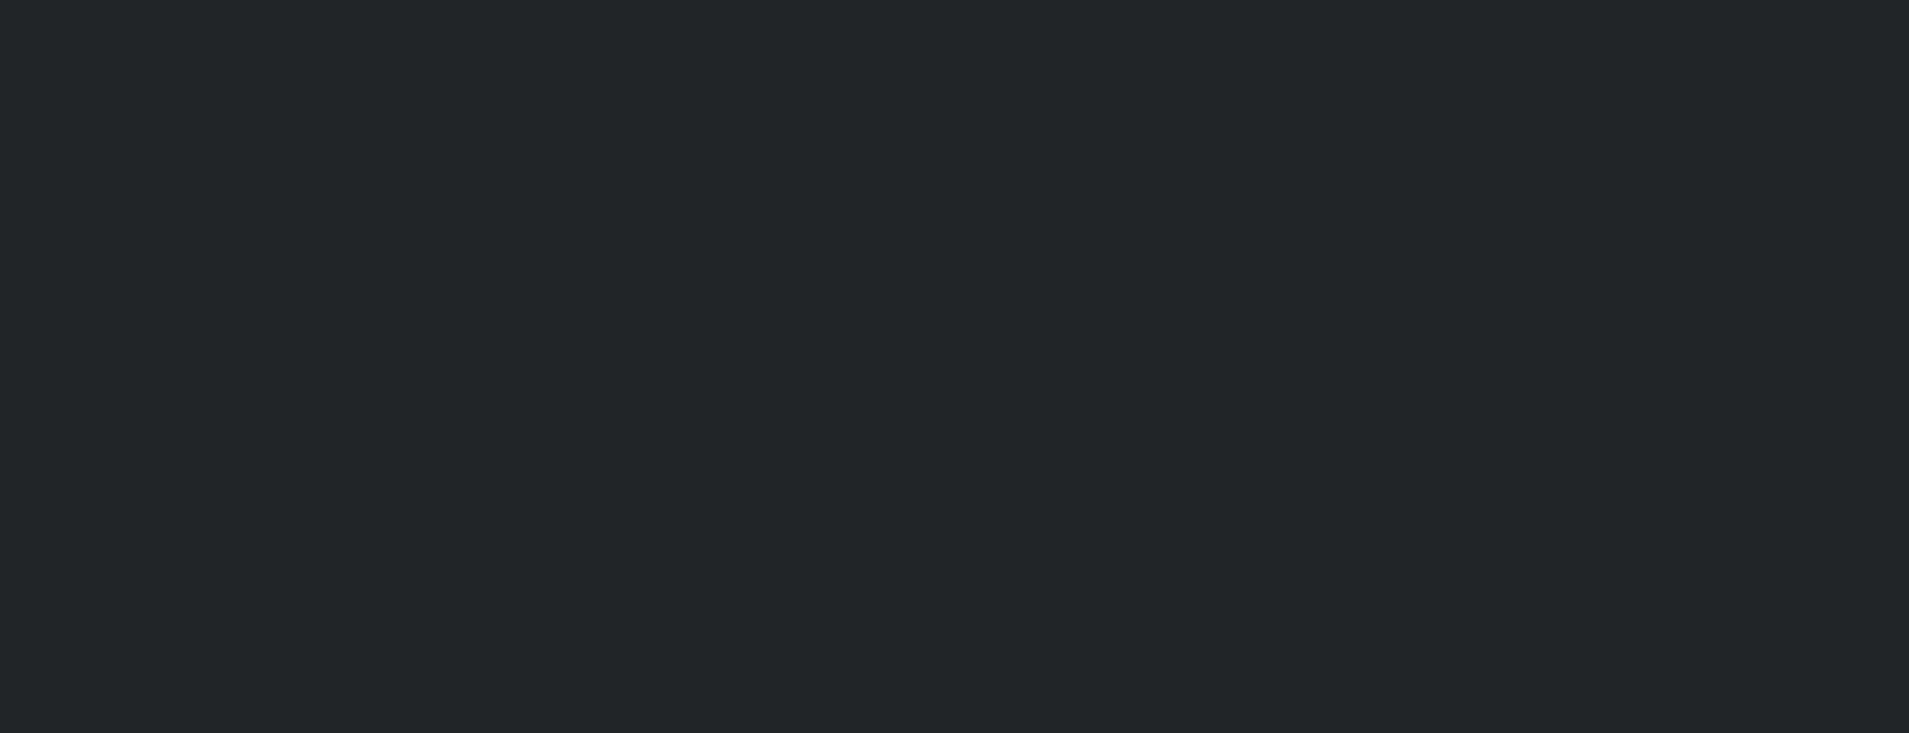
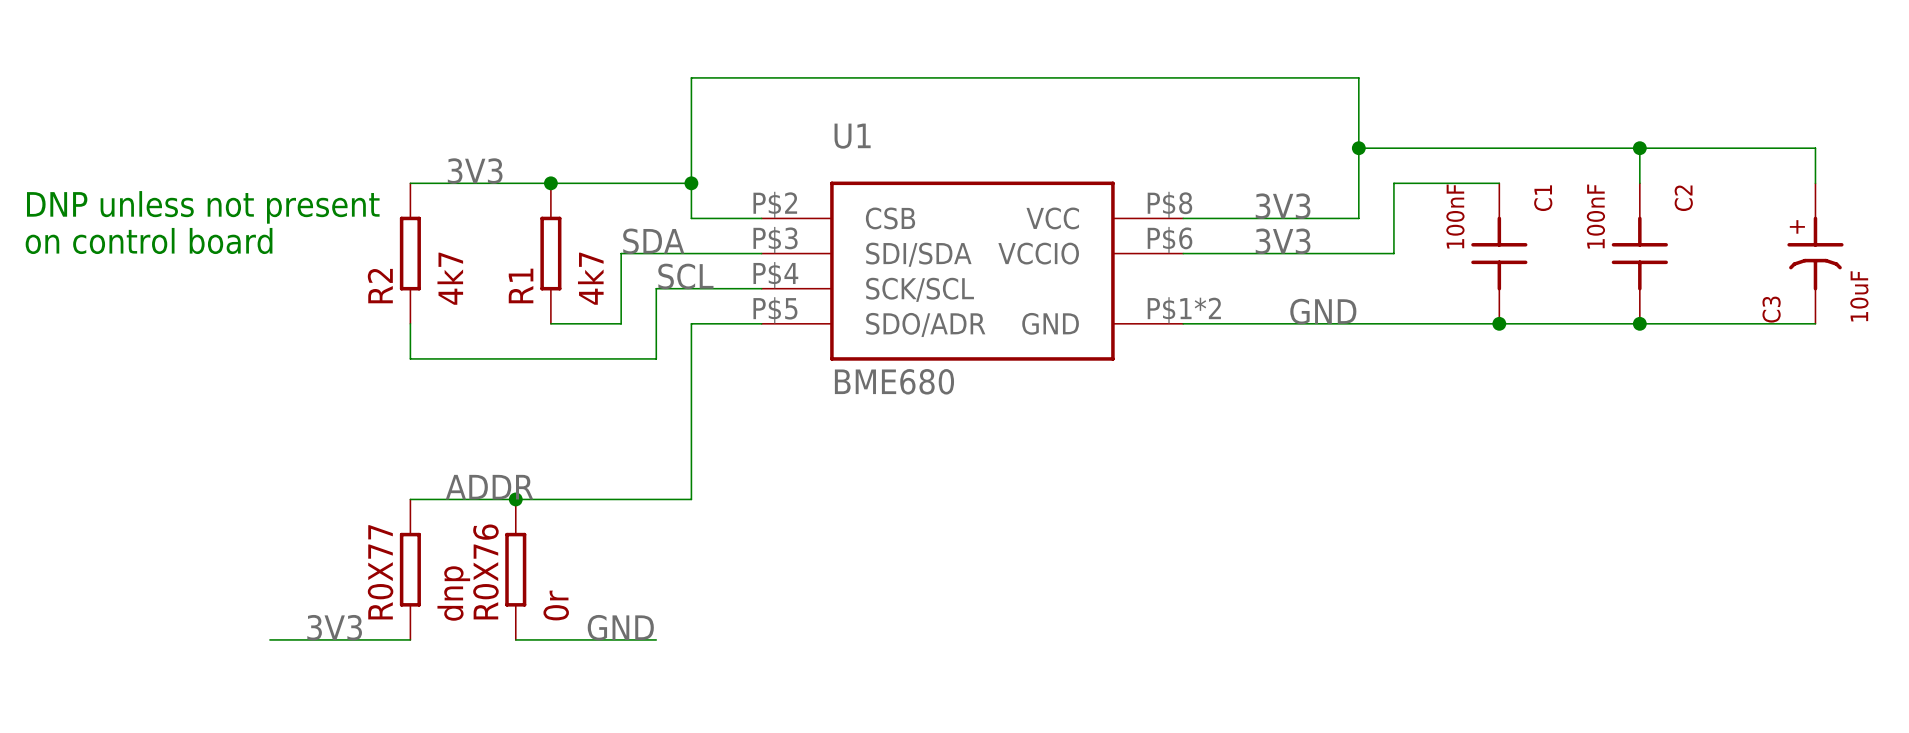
wire: none -> (1358, 148) (1815, 148) (1815, 183)
junction: none -> (1358, 148)
wire: none -> (1639, 148) (1639, 183)
junction: none -> (1639, 148)
label: none -> 3V3 (475, 171)
wire: none -> (410, 183) (691, 183)
junction: none -> (550, 183)
junction: none -> (691, 183)
wire: none -> (1499, 183) (1393, 183) (1393, 253) (1183, 253)
label: none -> 3V3 (1283, 206)
text: none -> DNP unless not present (203, 207)
wire: none -> (761, 218) (691, 218) (691, 77) (1358, 77) (1358, 218) (1183, 218)
text: none -> on control board (149, 240)
label: none -> SDA (653, 241)
label: none -> 3V3 (1283, 241)
R2: none -> 4k7 (410, 253)
R1: none -> 4k7 (550, 253)
wire: none -> (761, 253) (621, 253) (621, 323) (550, 323)
C1: none -> 100nF (1499, 253)
C2: none -> 100nF (1639, 253)
C3: none -> 10uF (1815, 253)
U1: none -> BME680 (972, 271)
label: none -> SCL (685, 276)
wire: none -> (761, 288) (656, 288) (656, 358) (410, 358) (410, 323)
label: none -> GND (1323, 311)
wire: none -> (761, 323) (691, 323) (691, 499) (410, 499)
wire: none -> (1183, 323) (1815, 323)
junction: none -> (1499, 323)
junction: none -> (1639, 323)
label: none -> ADDR (489, 487)
junction: none -> (515, 499)
R0X77: none -> dnp (410, 569)
R0X76: none -> 0r (515, 569)
label: none -> 3V3 (334, 627)
label: none -> GND (620, 627)
wire: none -> (269, 639) (410, 639)
wire: none -> (515, 639) (656, 639)

